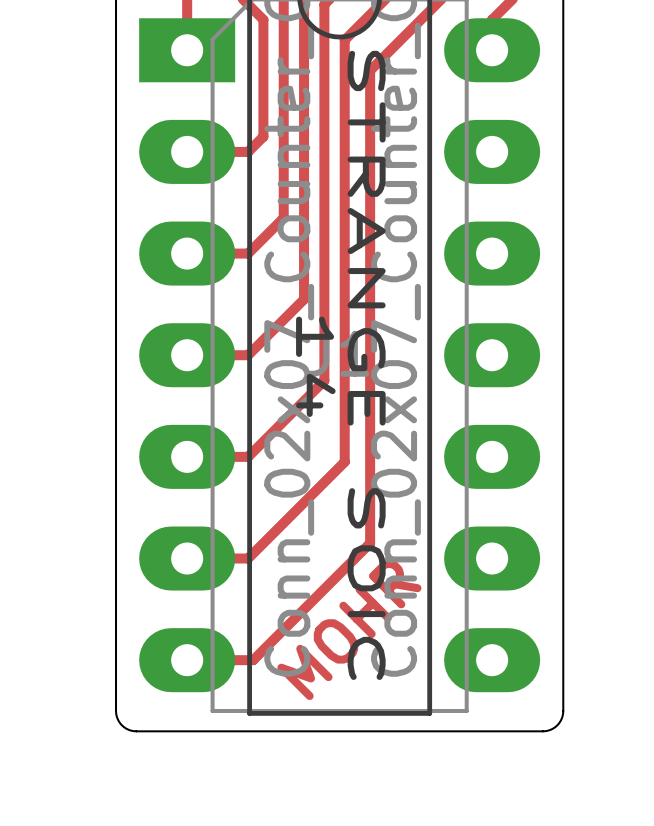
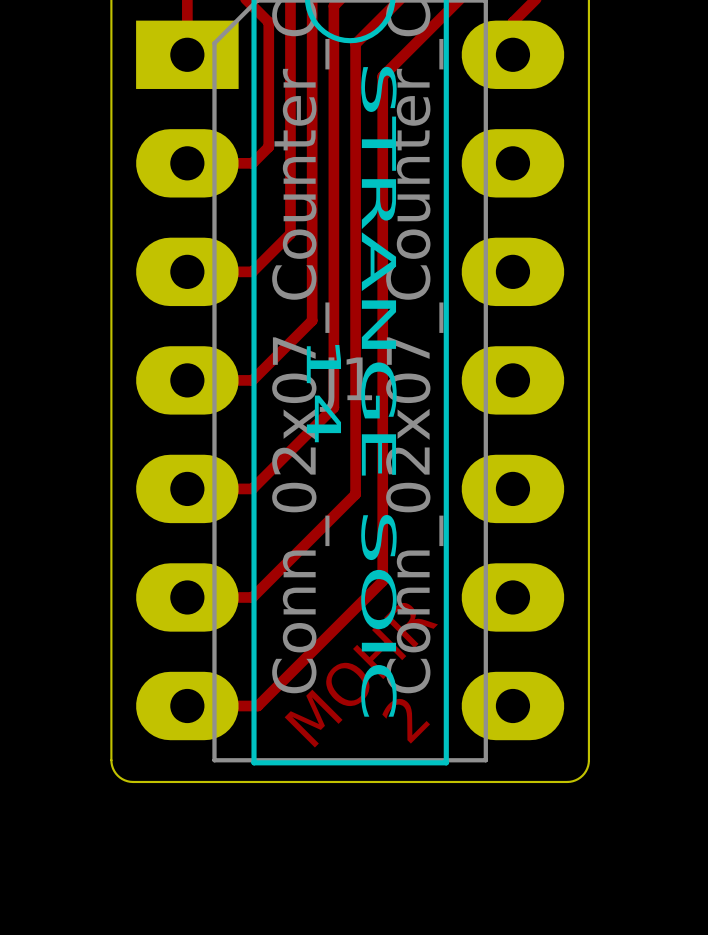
text: none -> 2 (406, 721)

